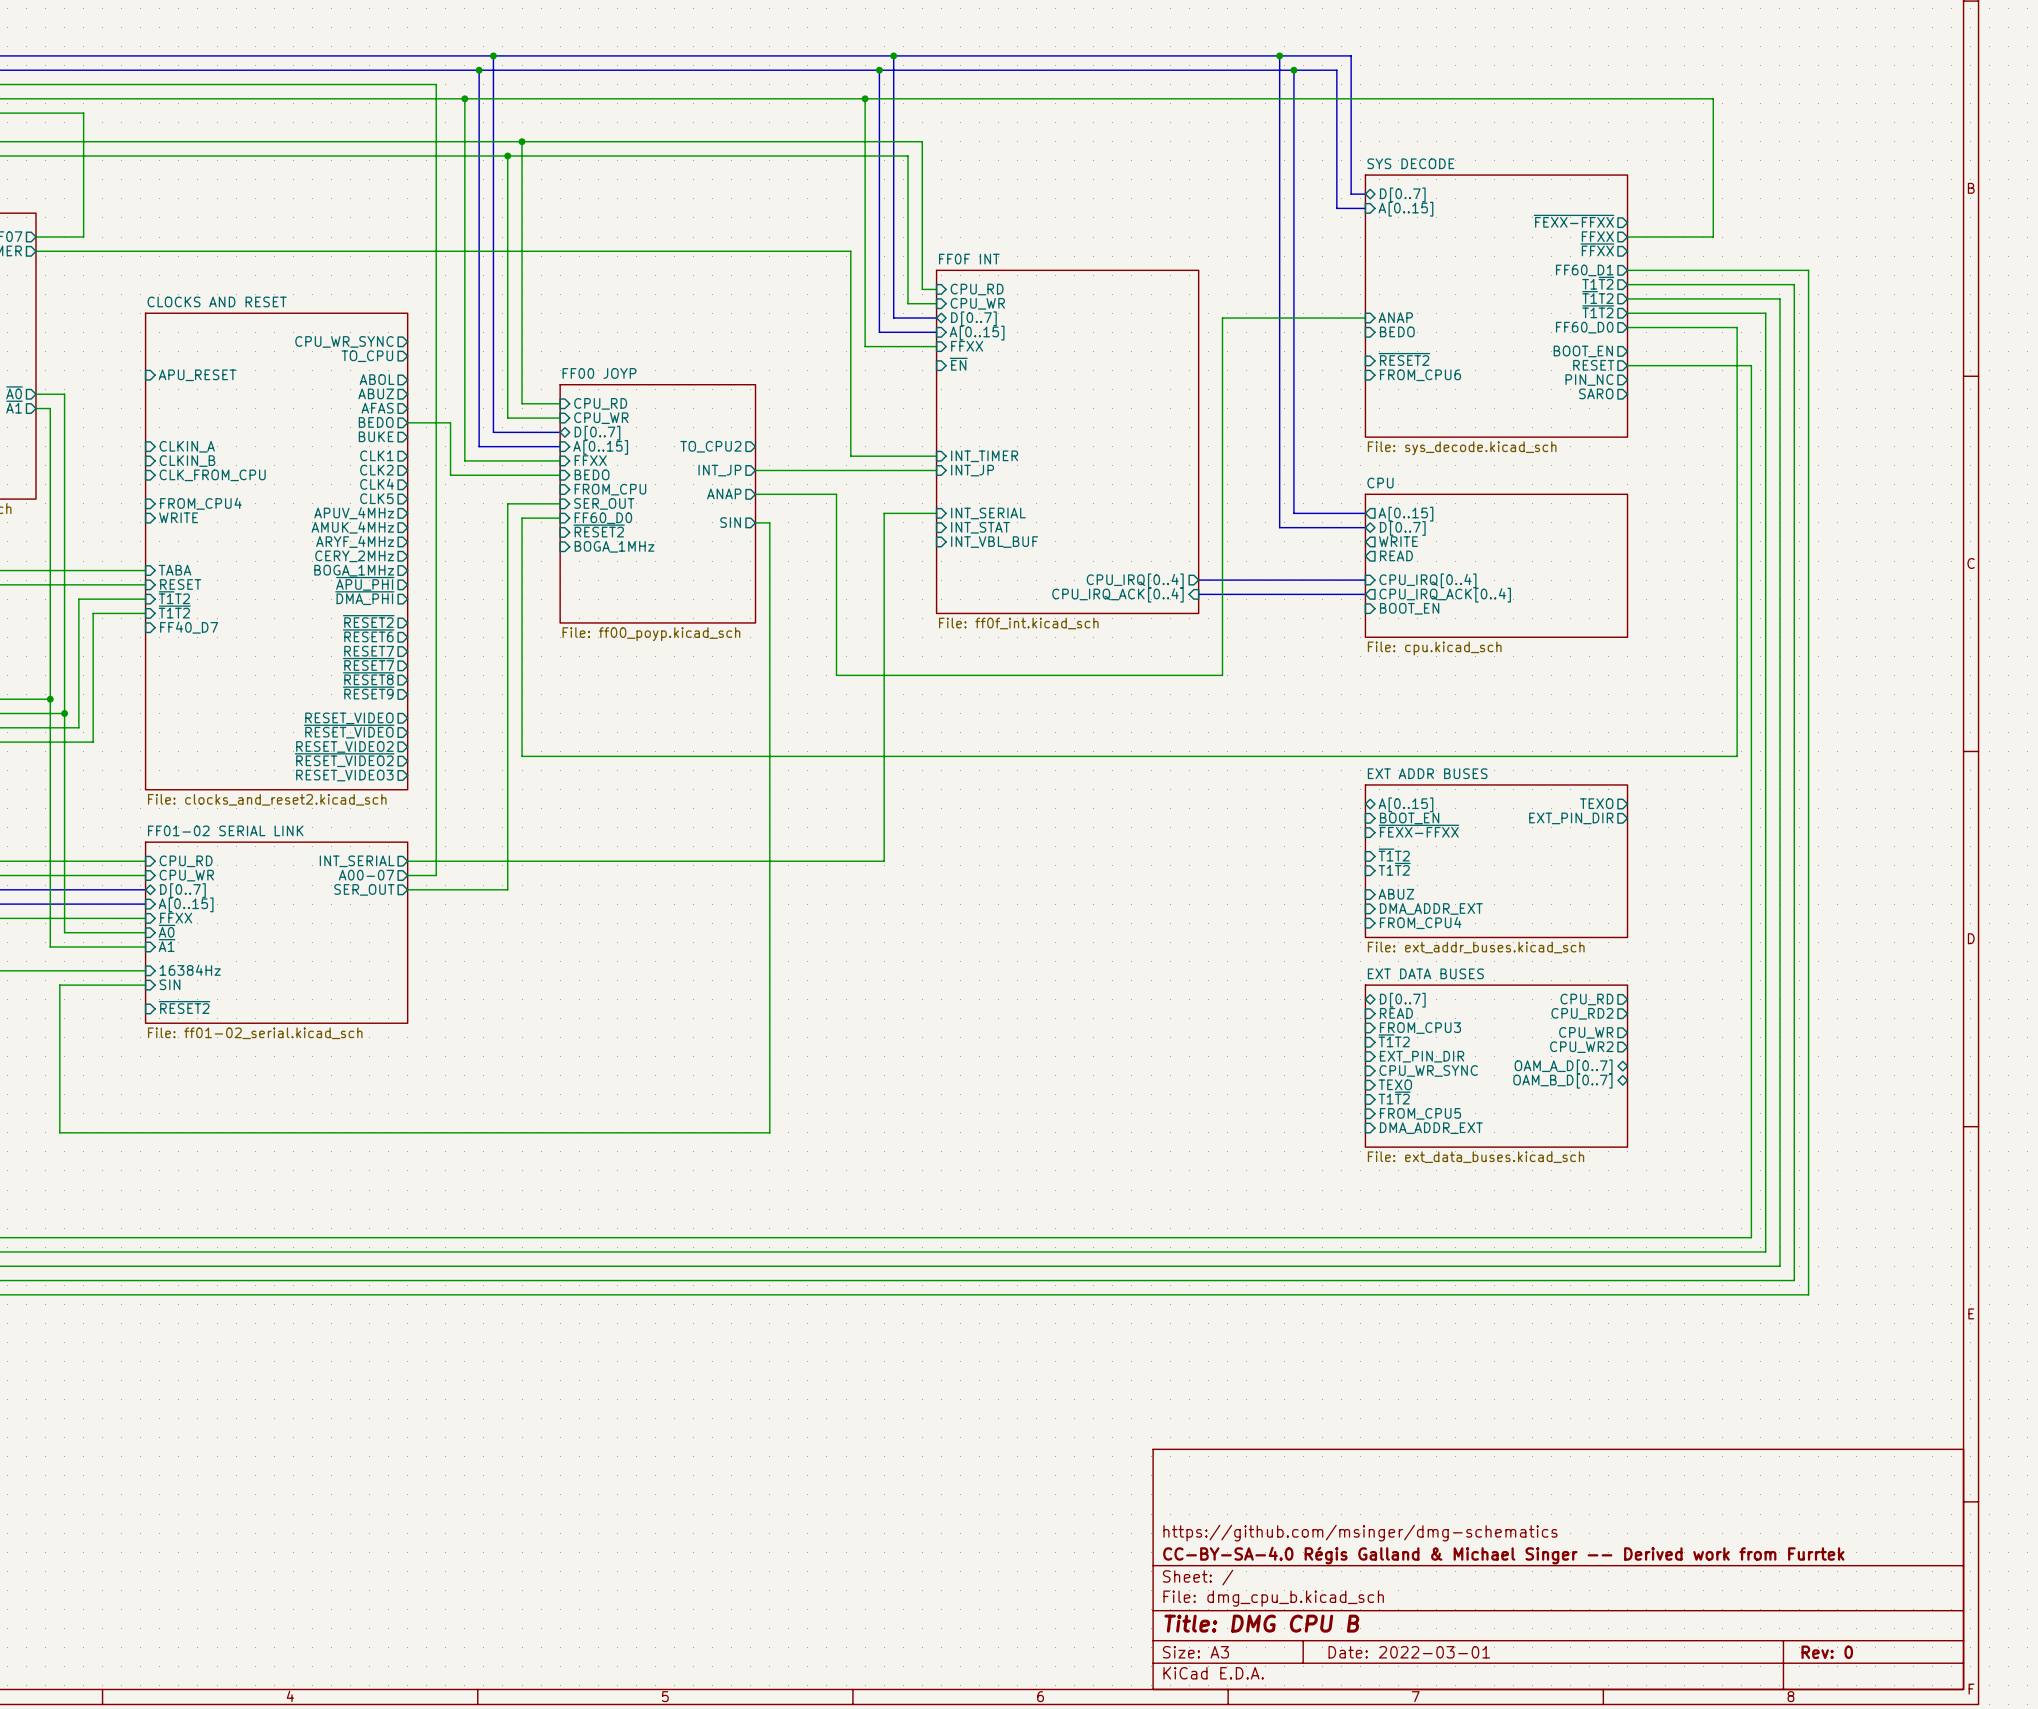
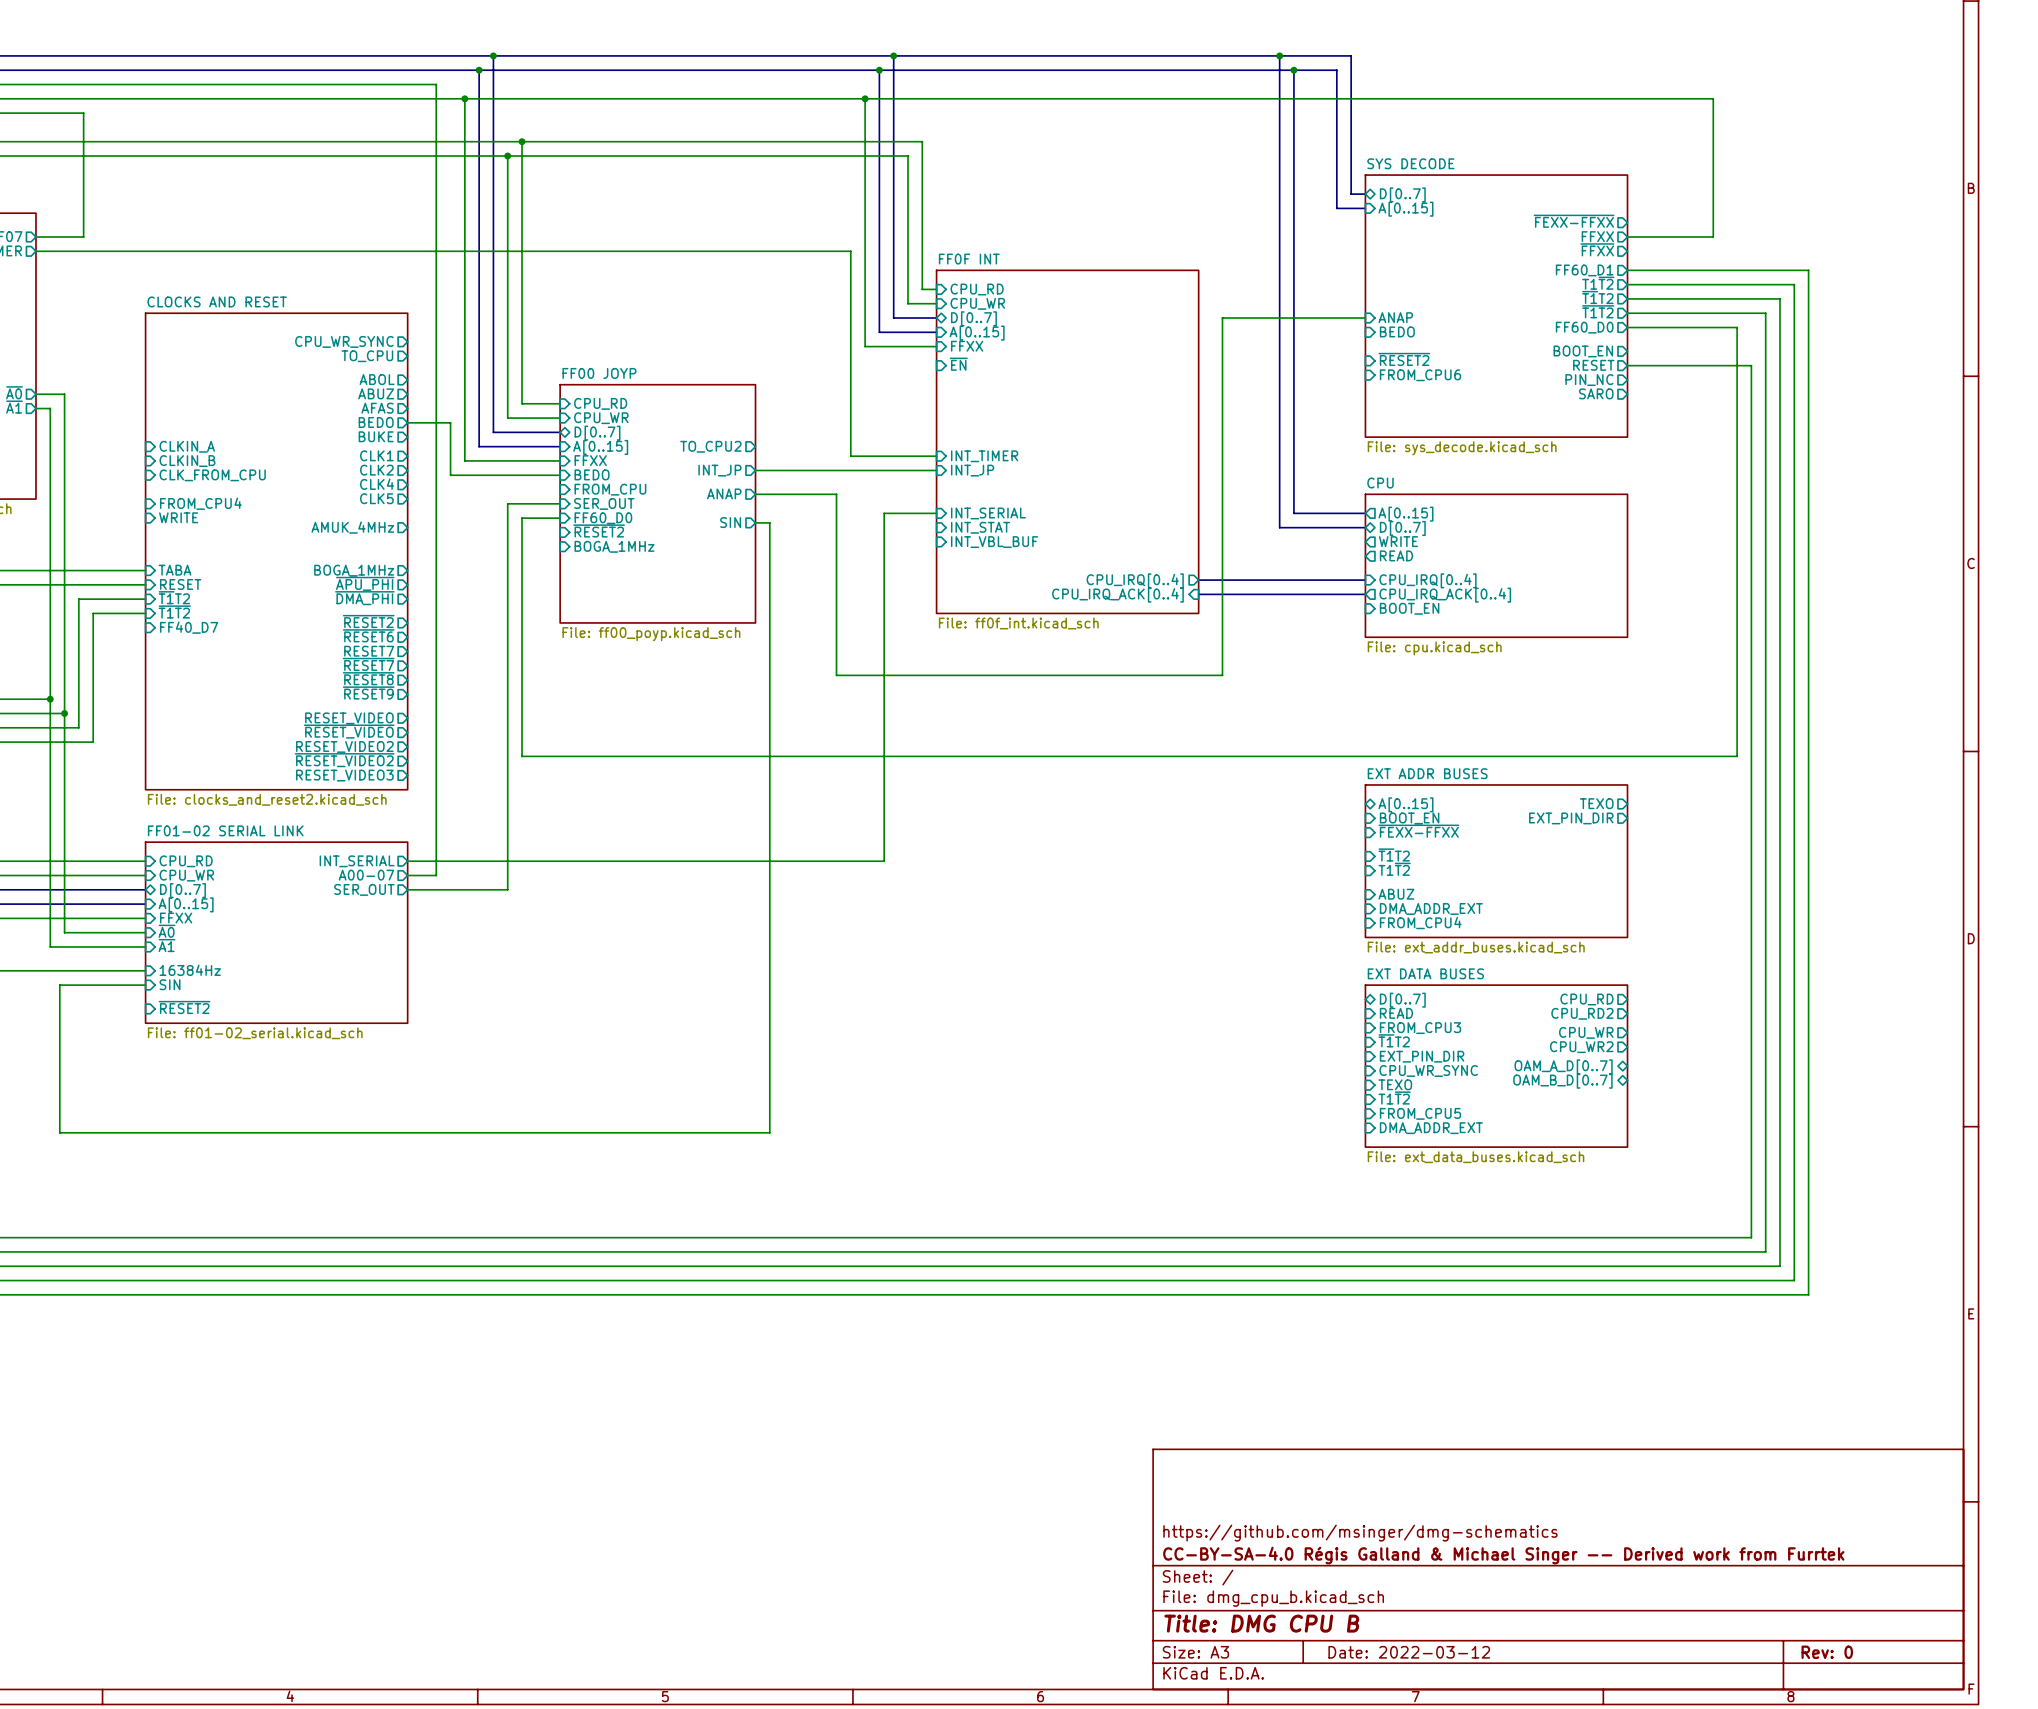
sheet pin: APU_RESET (197, 375) -> none
sheet pin: APUV_4MHz (354, 513) -> none
sheet pin: ARYF_4MHz (355, 541) -> none
sheet pin: CERY_2MHz (354, 556) -> none
title block: Date: 2022-03-01 (1409, 1652) -> Date: 2022-03-12 (1409, 1652)

